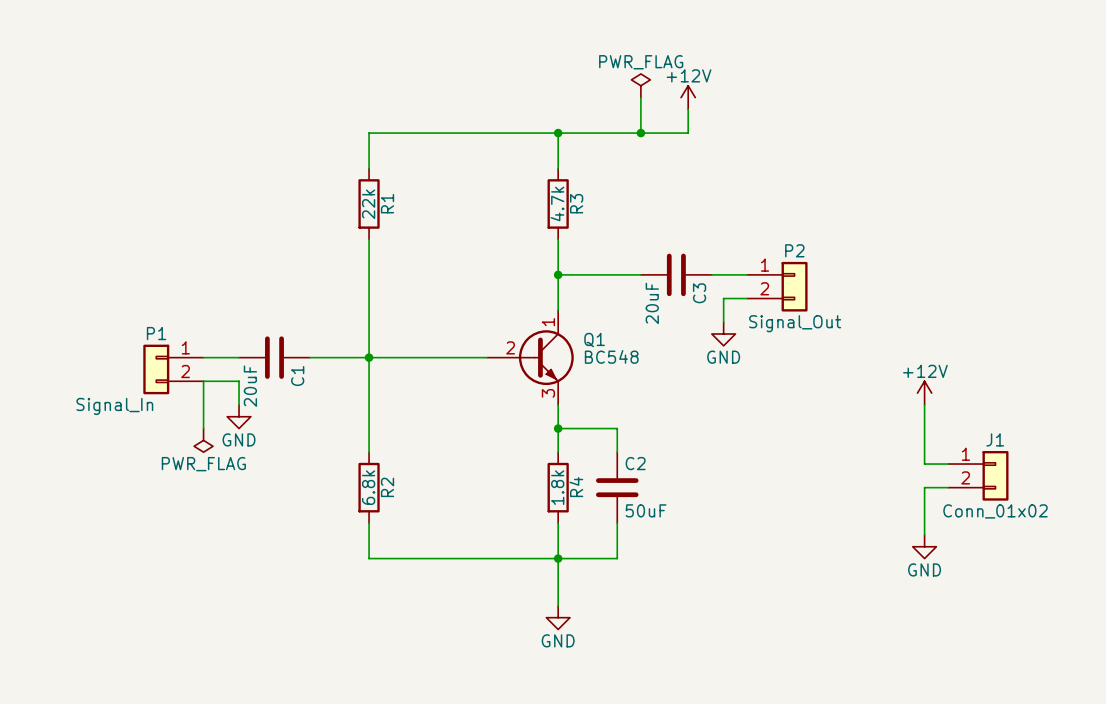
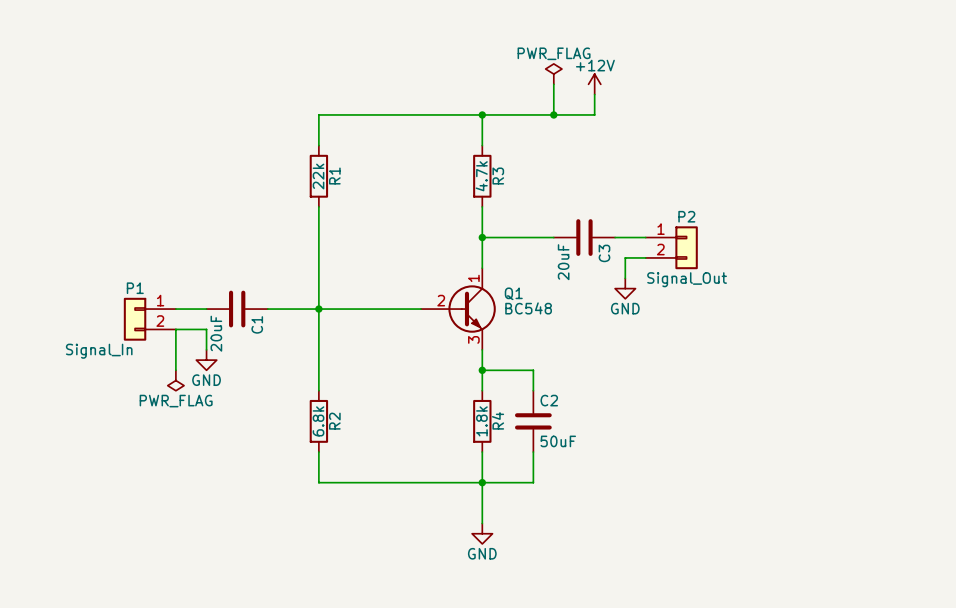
power symbol: +12V (924, 393) -> none
wire: (924, 404) (924, 464) (948, 464) -> none
J1: Conn_01x02 (978, 475) -> none
wire: (948, 487) (924, 487) (924, 534) -> none
power symbol: GND (924, 546) -> none

